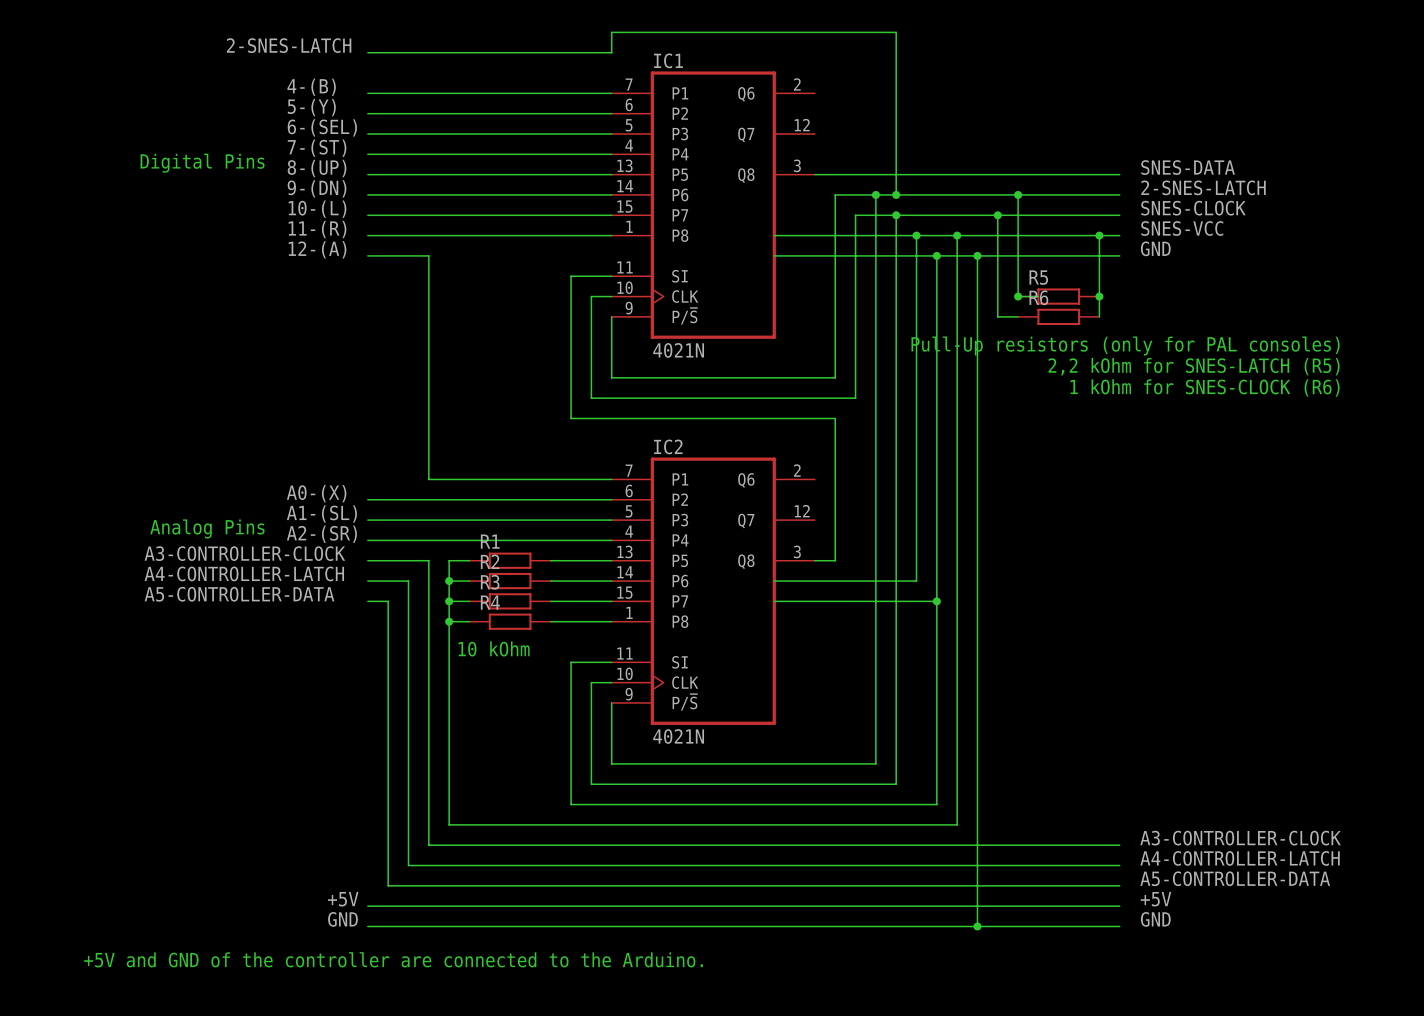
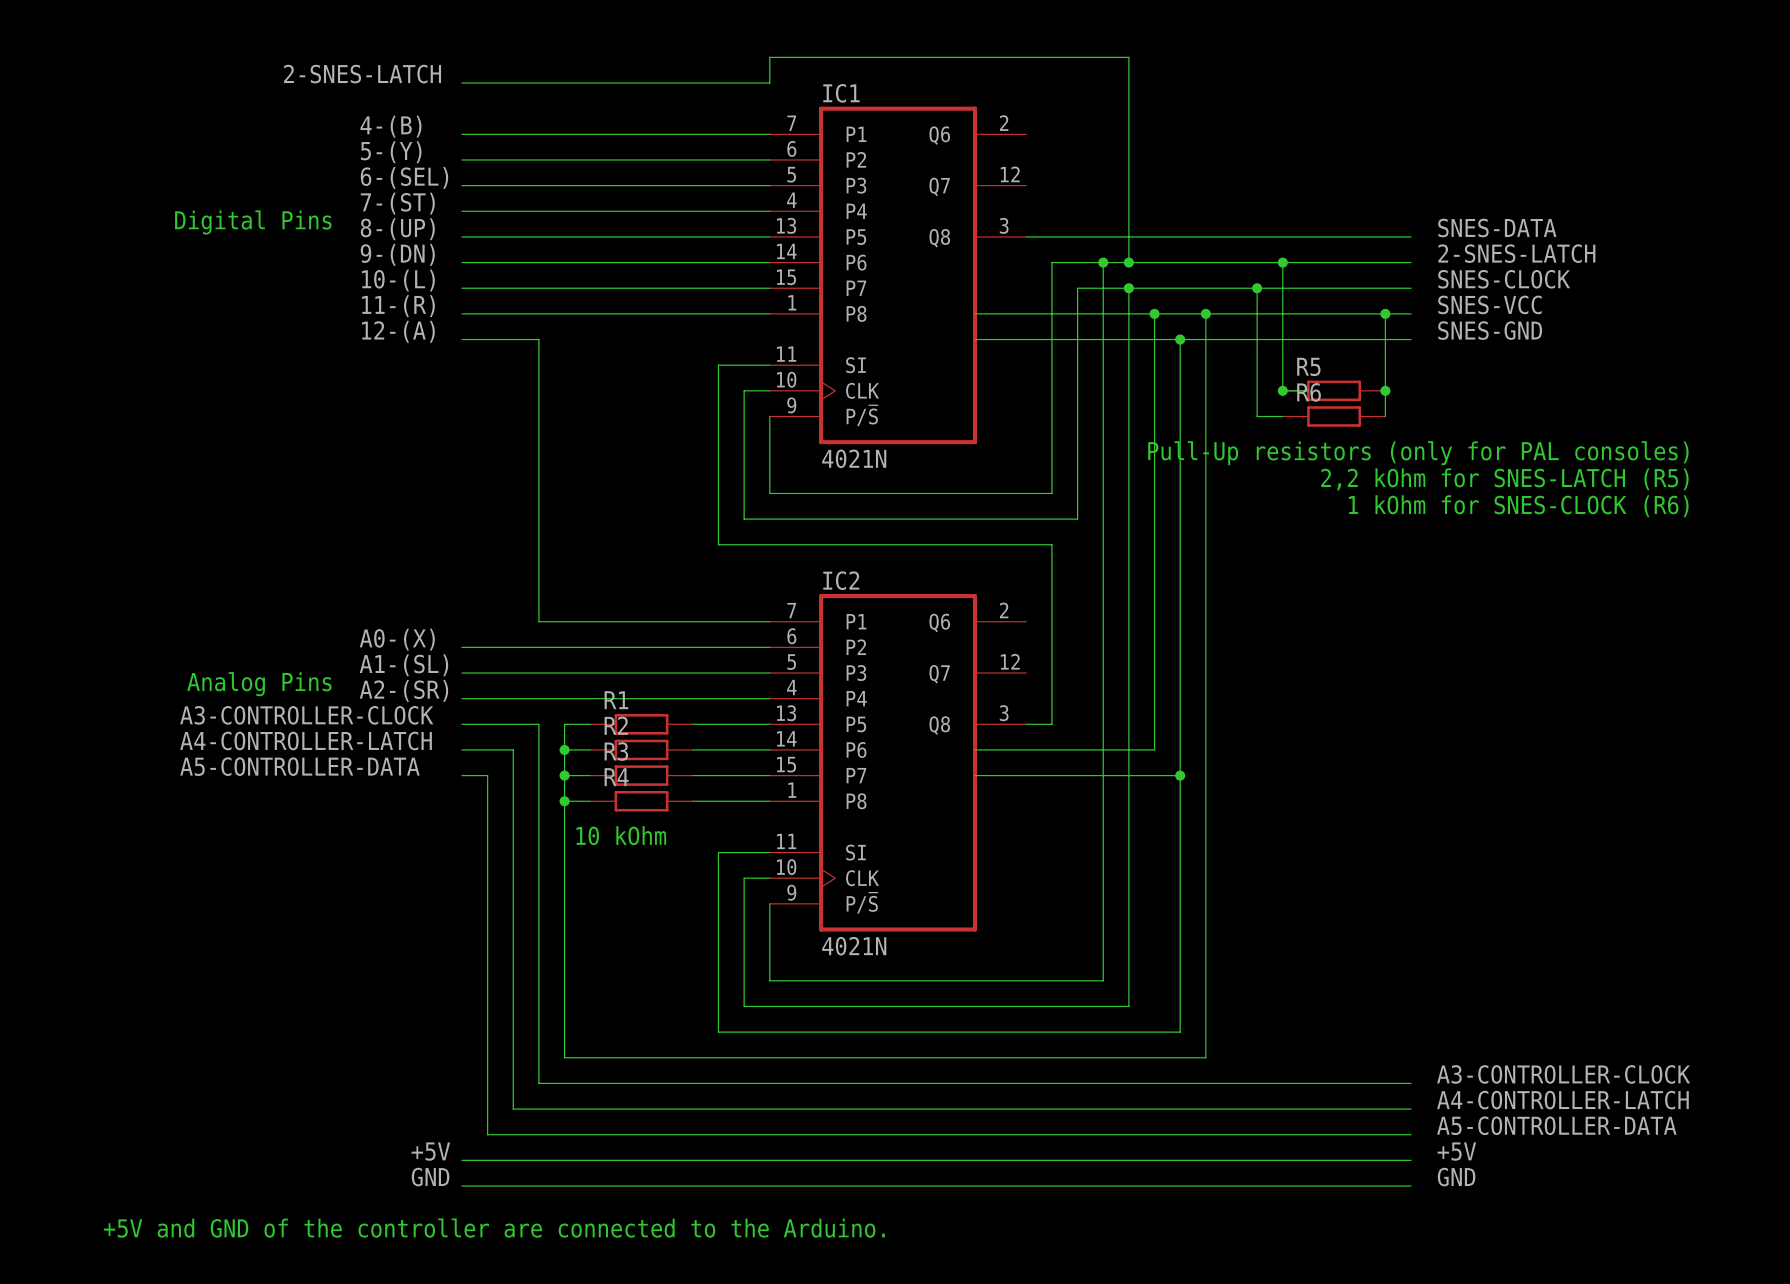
label: GND (1155, 248) -> SNES-GND (1490, 330)
wire: (977, 255) (977, 926) -> none
junction: (977, 255) -> none
junction: (977, 926) -> none

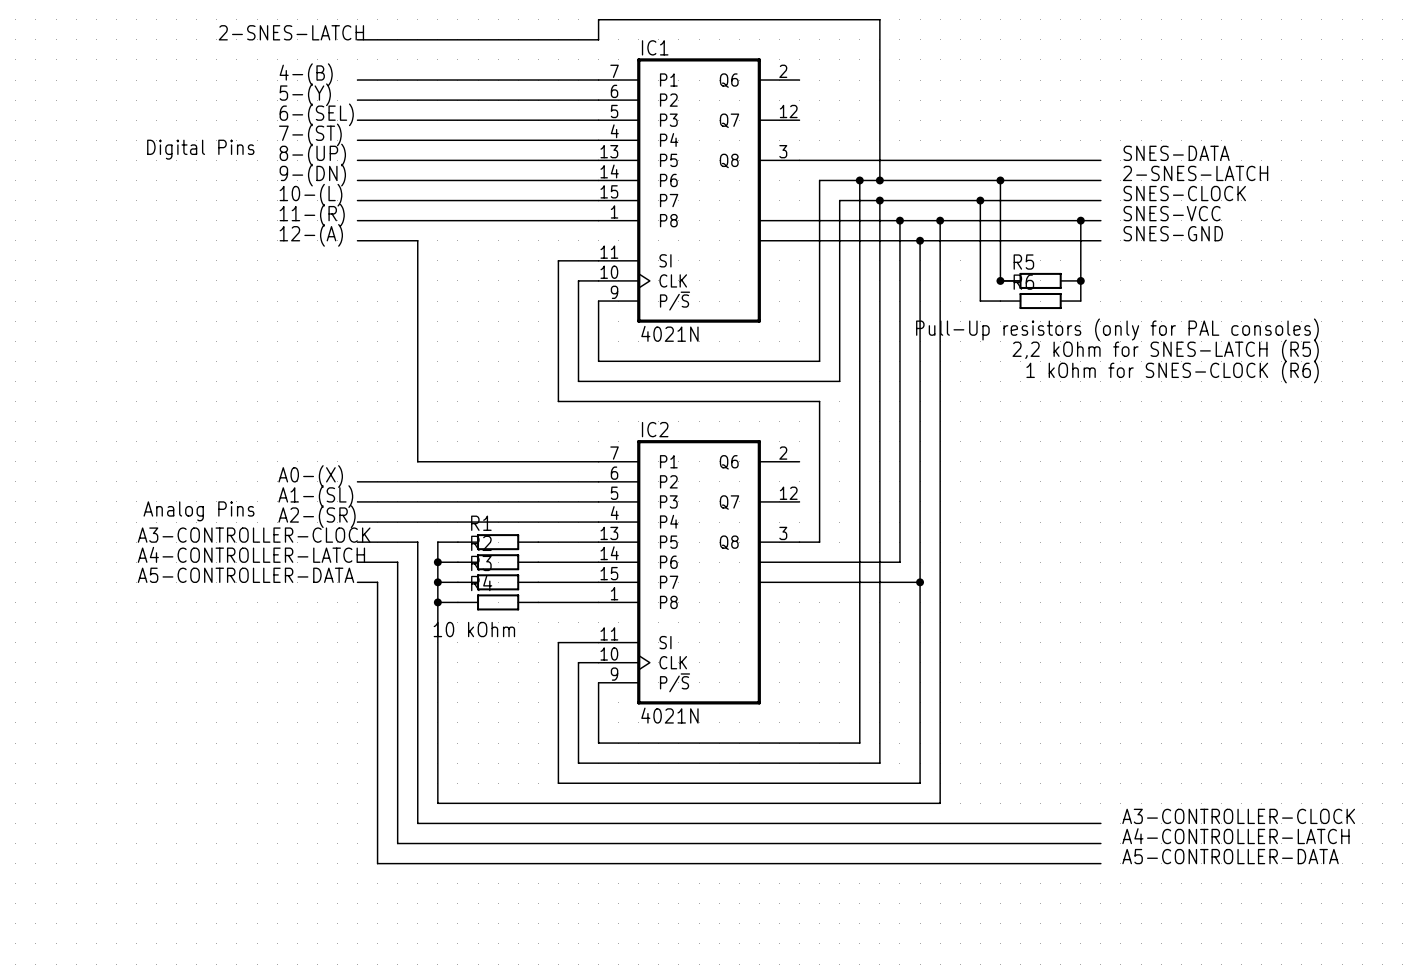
label: +5V (430, 1151) -> none
label: +5V (1456, 1151) -> none
wire: (461, 1160) (1411, 1160) -> none
label: GND (430, 1177) -> none
label: GND (1456, 1177) -> none
wire: (461, 1186) (1411, 1186) -> none
text: +5V and GND of the controller are connected to the Arduino. (494, 1228) -> none

